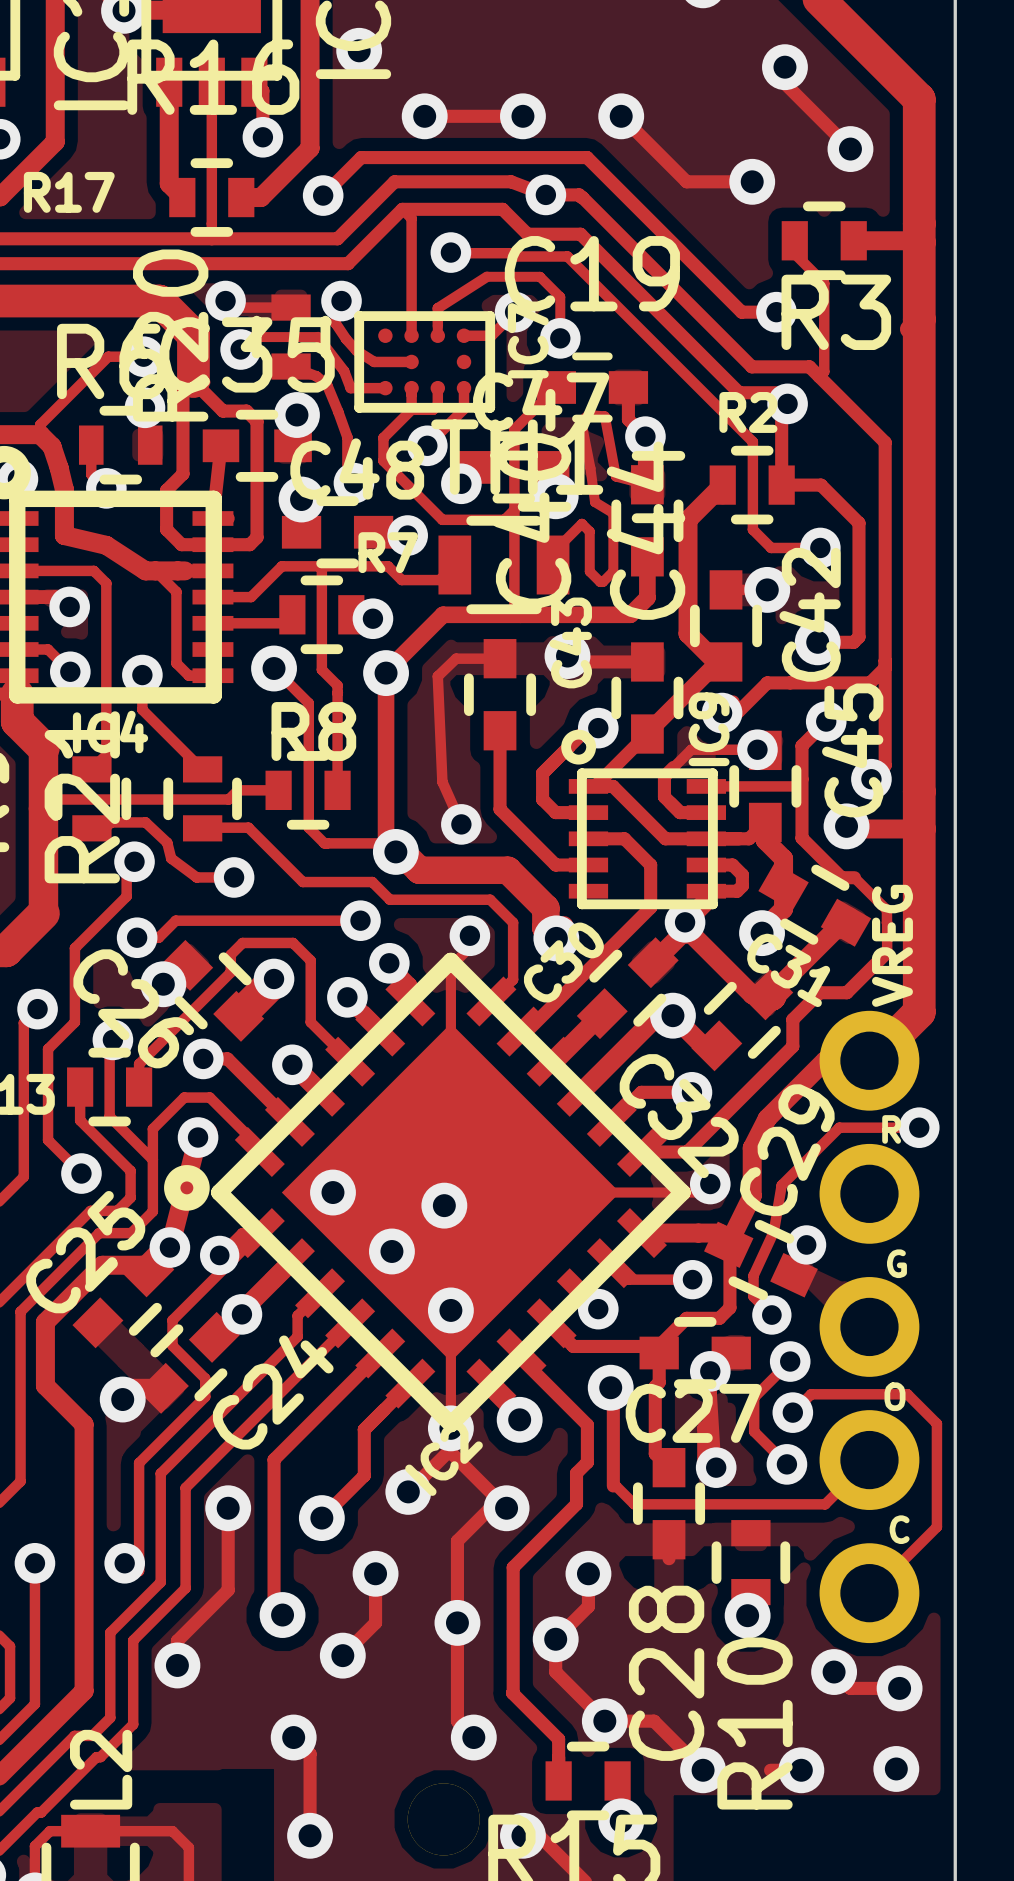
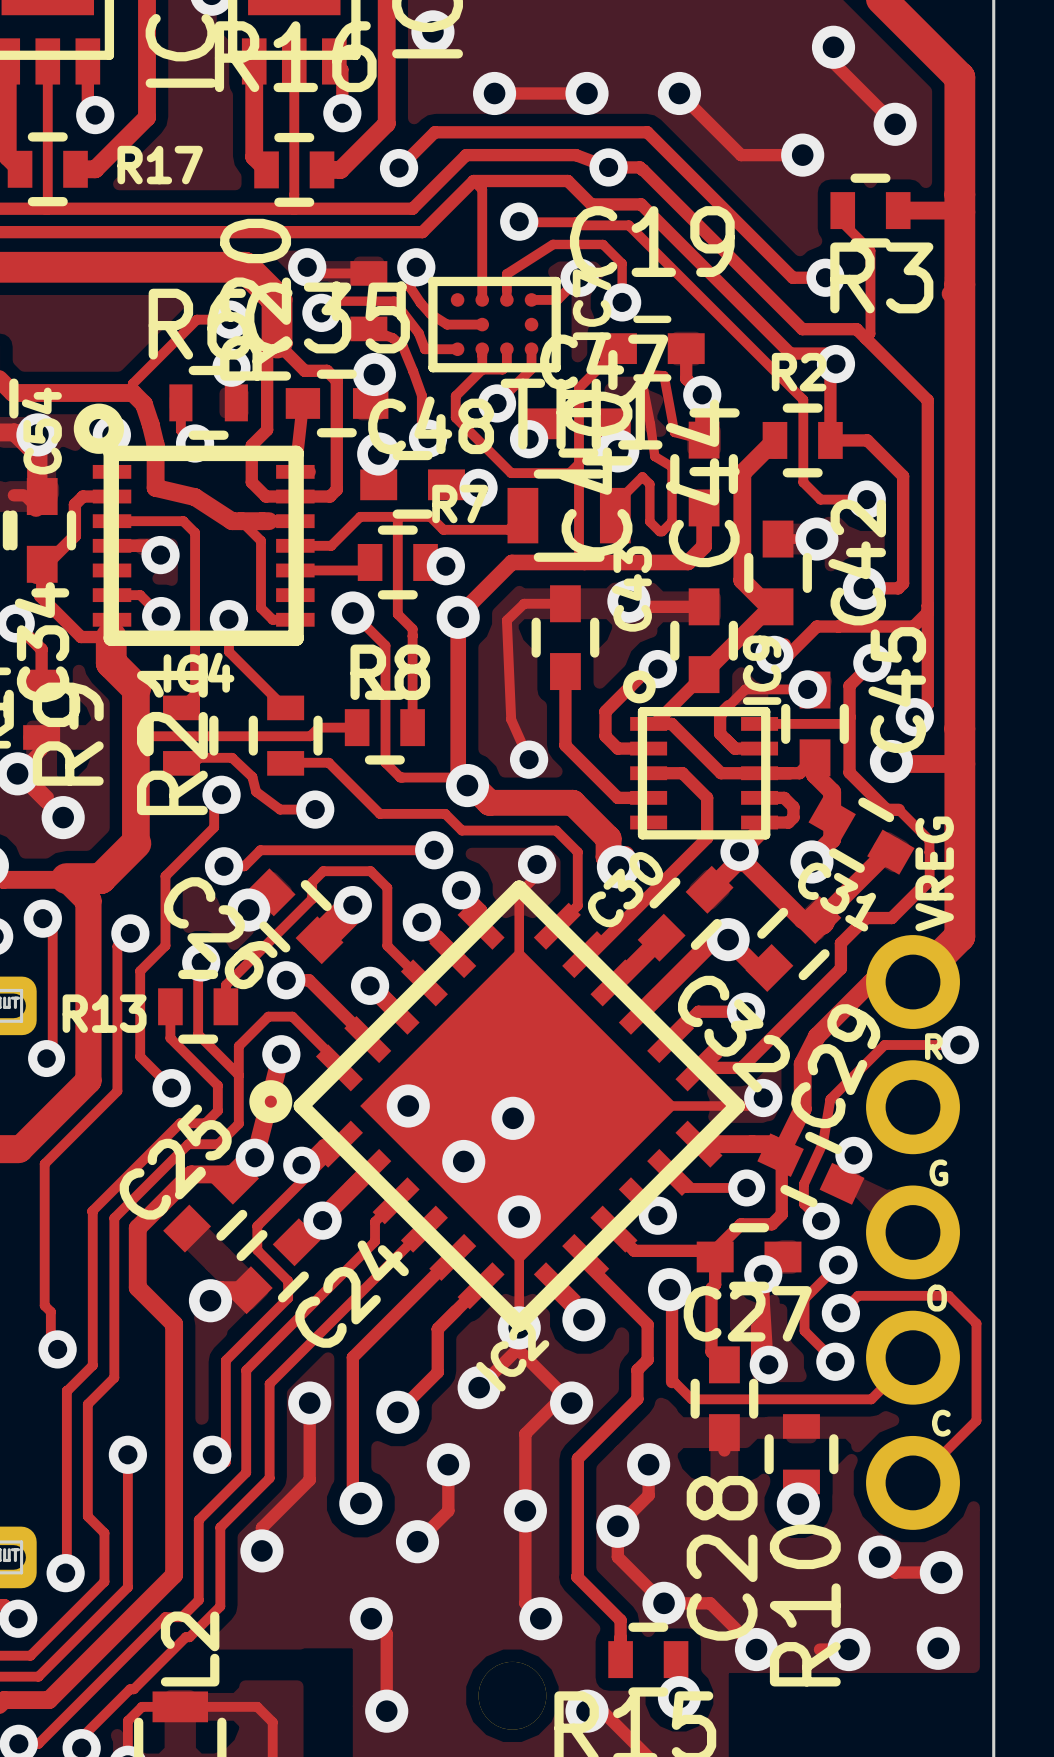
track: (356, 566) (388, 566) (401, 580) -> (430, 516) (443, 529) (473, 529)

